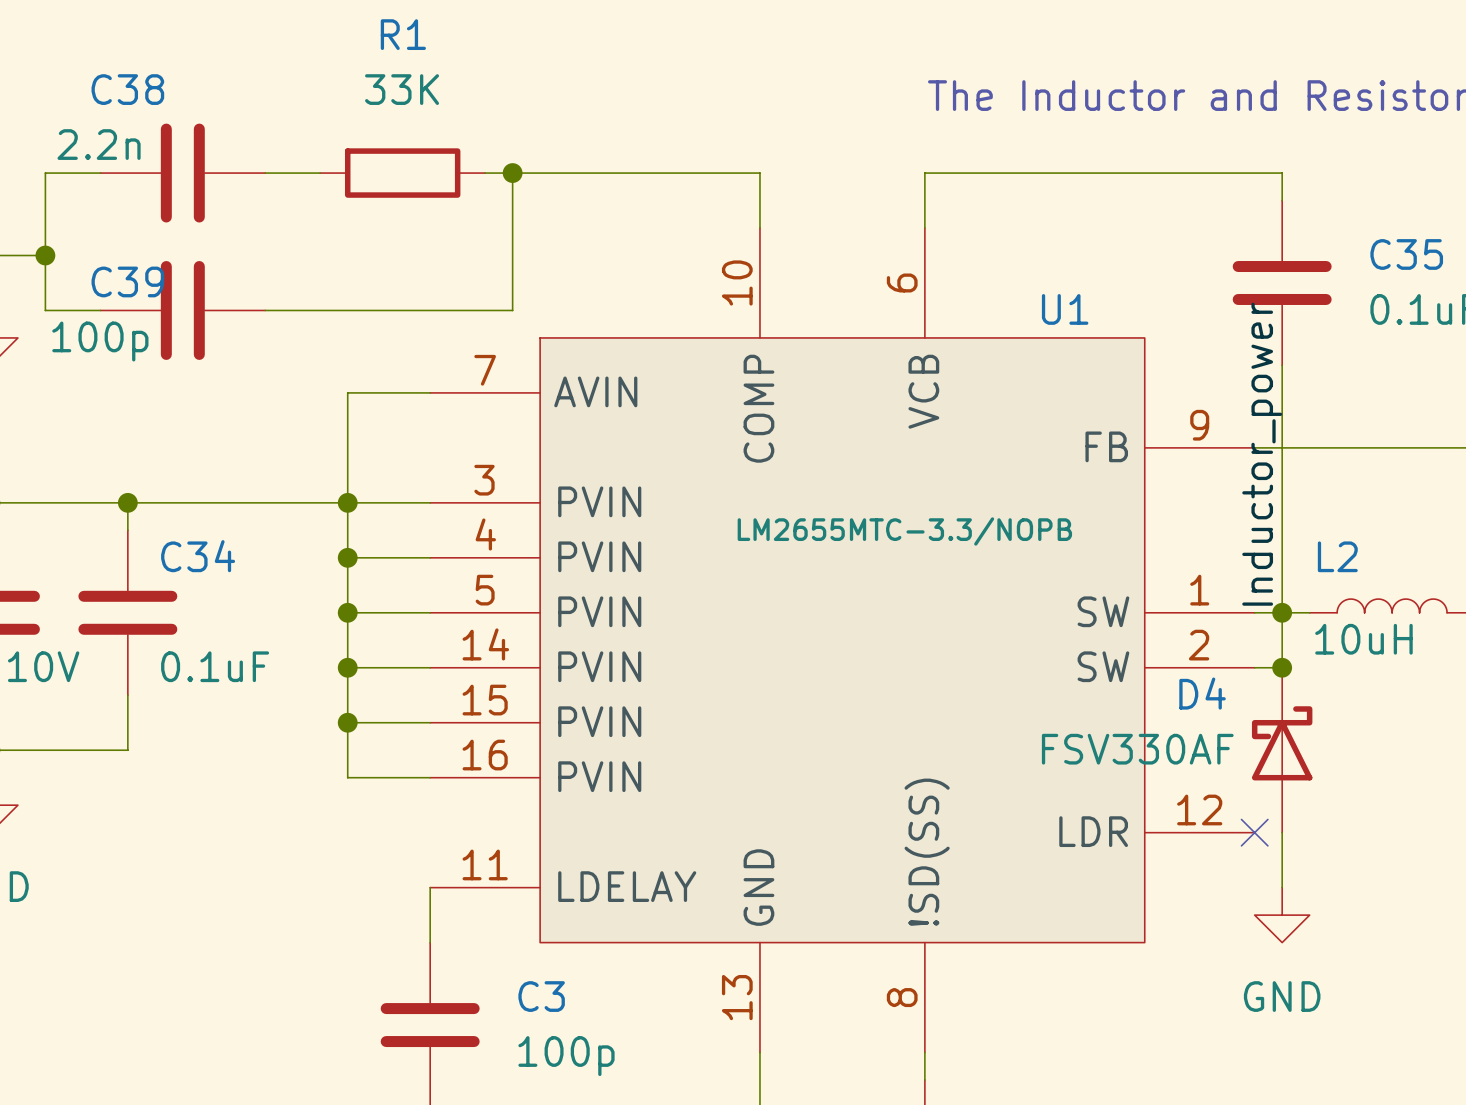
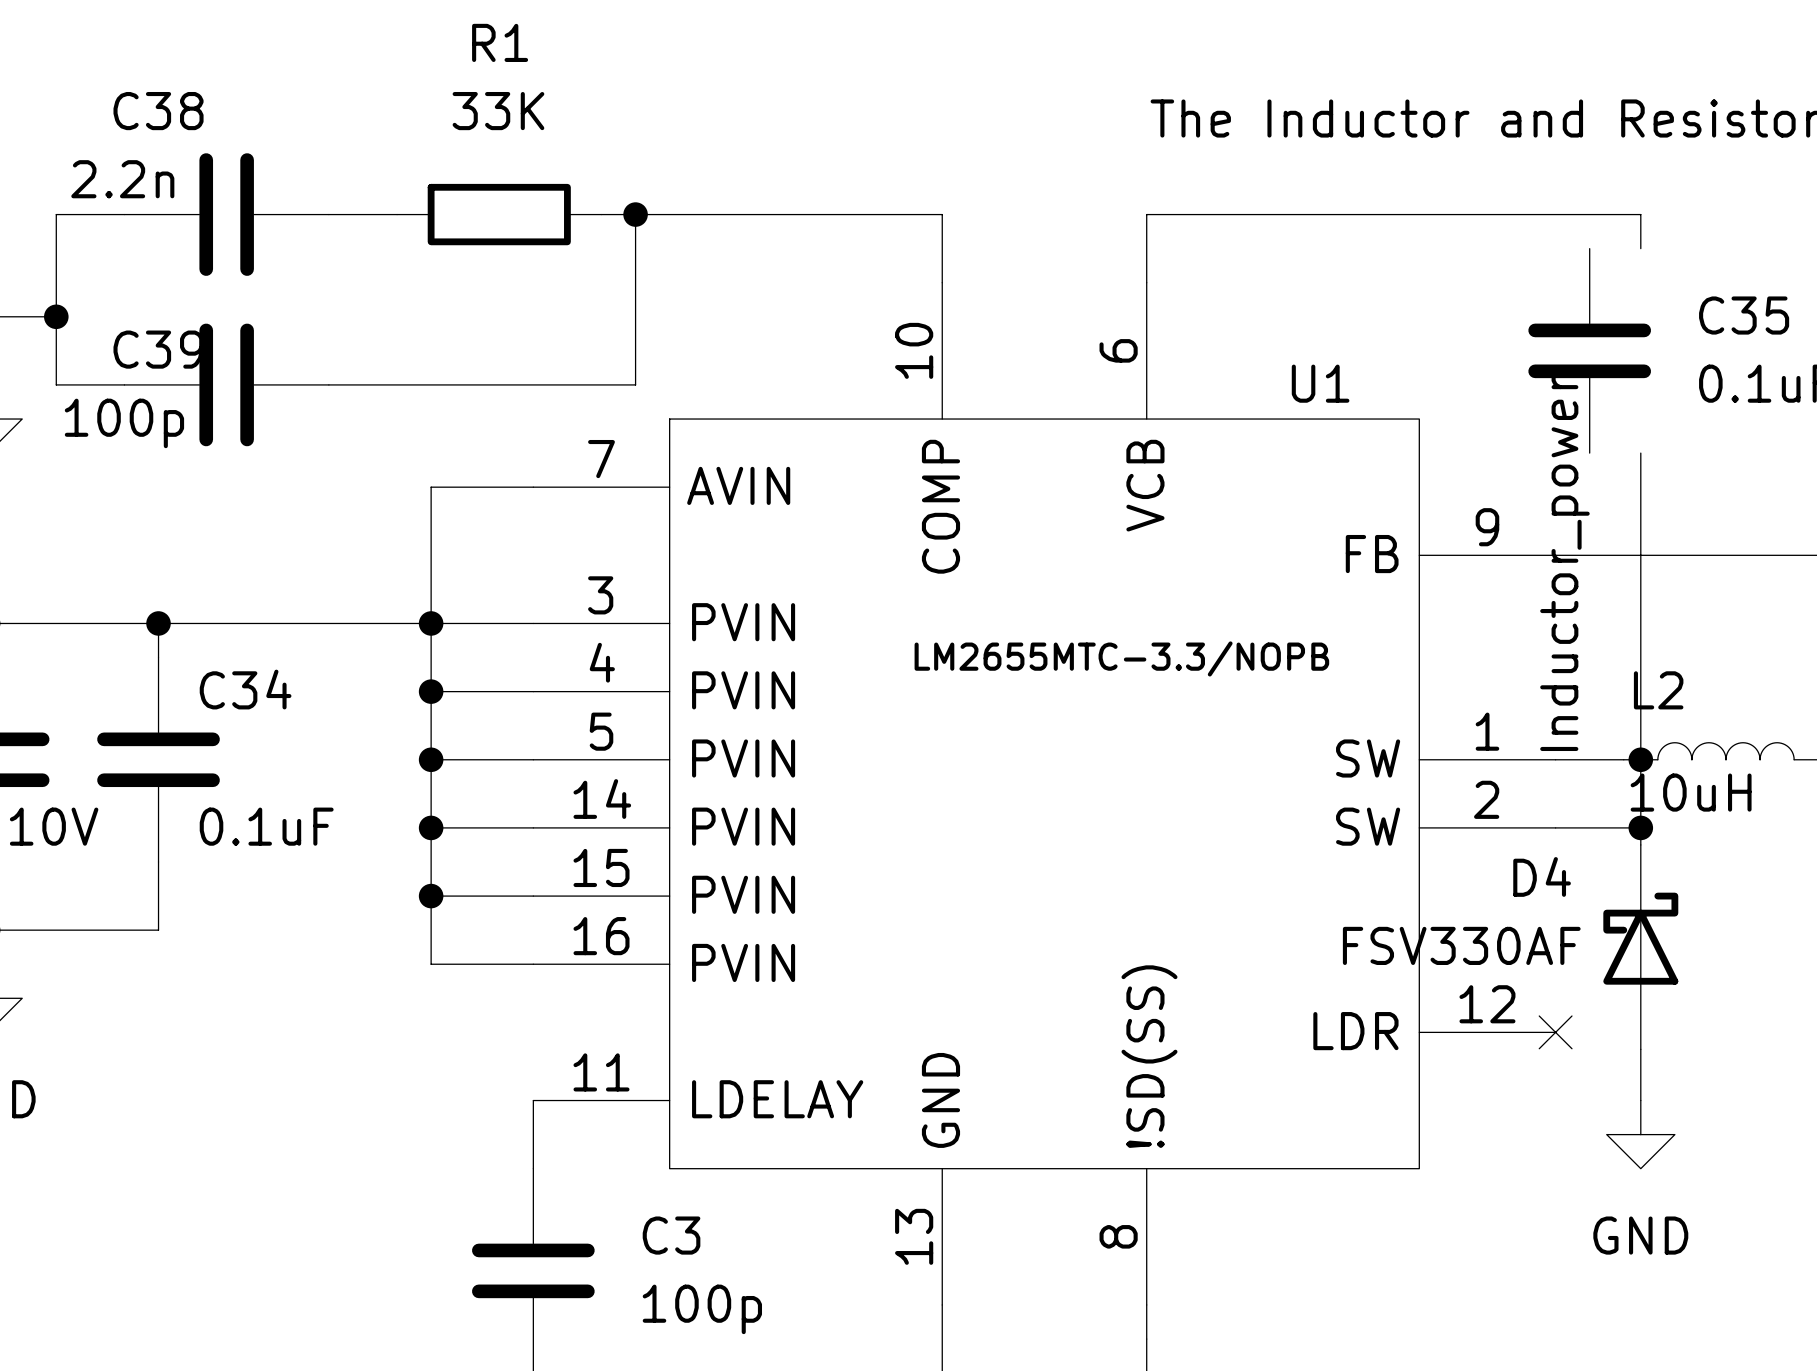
wire: (1282, 173) (1282, 200) -> (1589, 214) (1640, 214) (1640, 248)
wire: (1282, 365) (1282, 667) -> (1640, 827) (1589, 827)
wire: none -> (1640, 453) (1640, 844)
junction: (1282, 612) -> none
junction: none -> (1640, 759)
junction: (1282, 667) -> none
junction: none -> (1640, 827)
D4 position: (1282, 750) -> (1640, 947)
wire: (1282, 832) (1282, 887) -> none
wire: none -> (1640, 1049) (1640, 1100)
power symbol position: GND (1282, 915) -> GND (1640, 1134)

